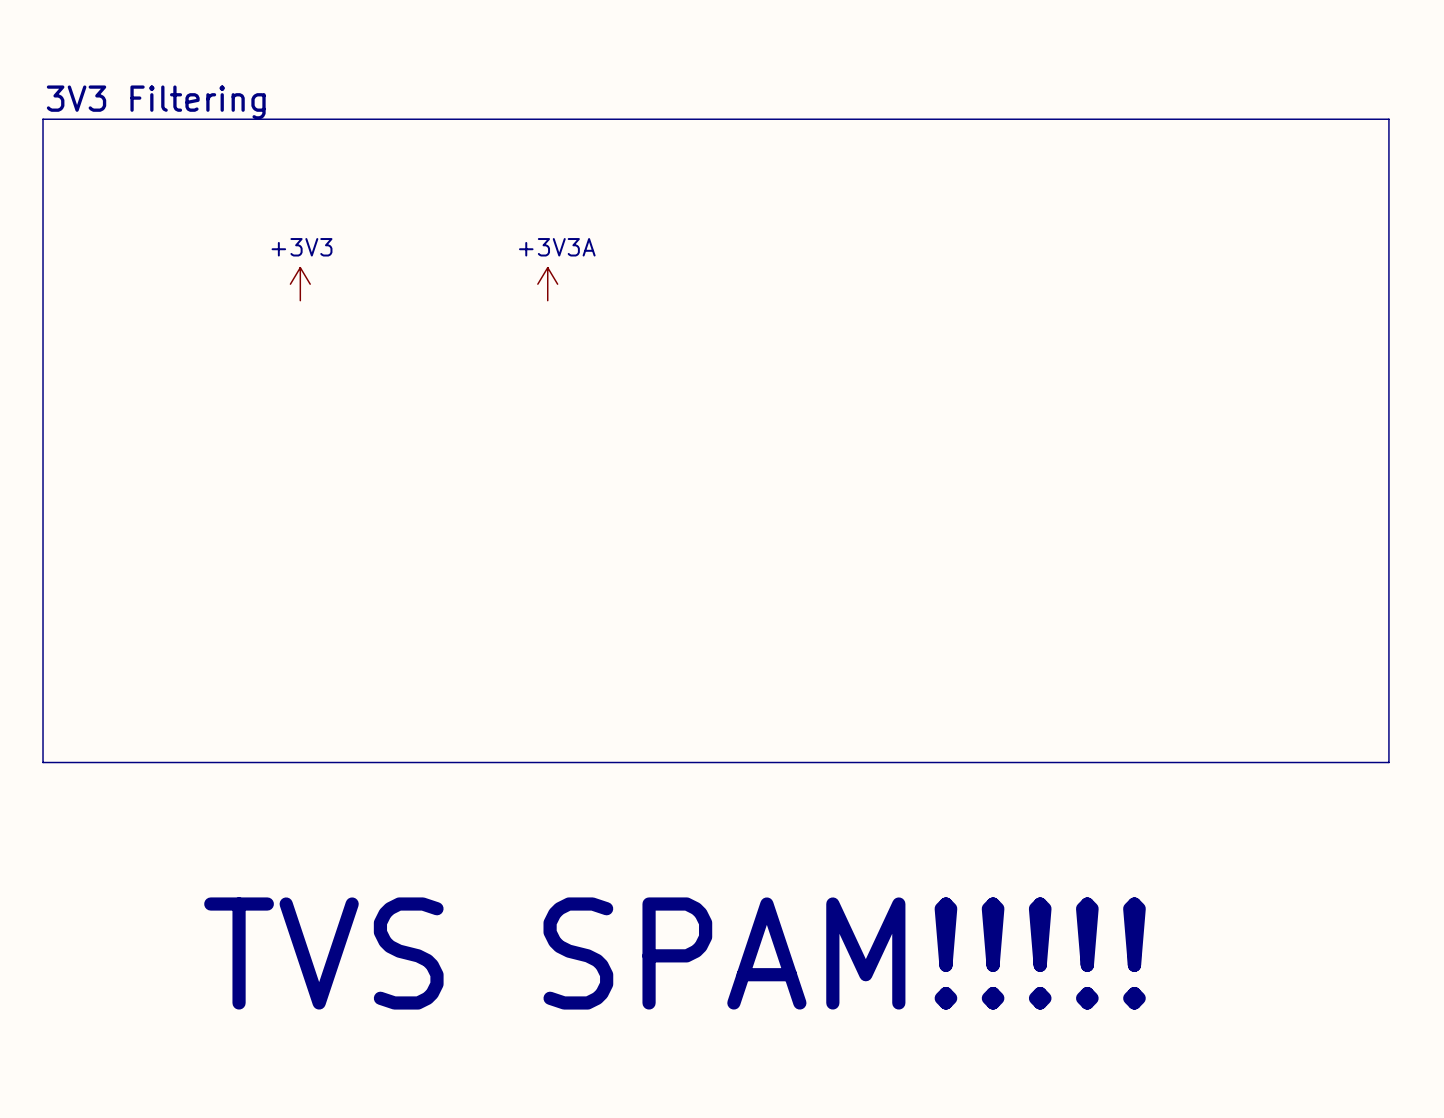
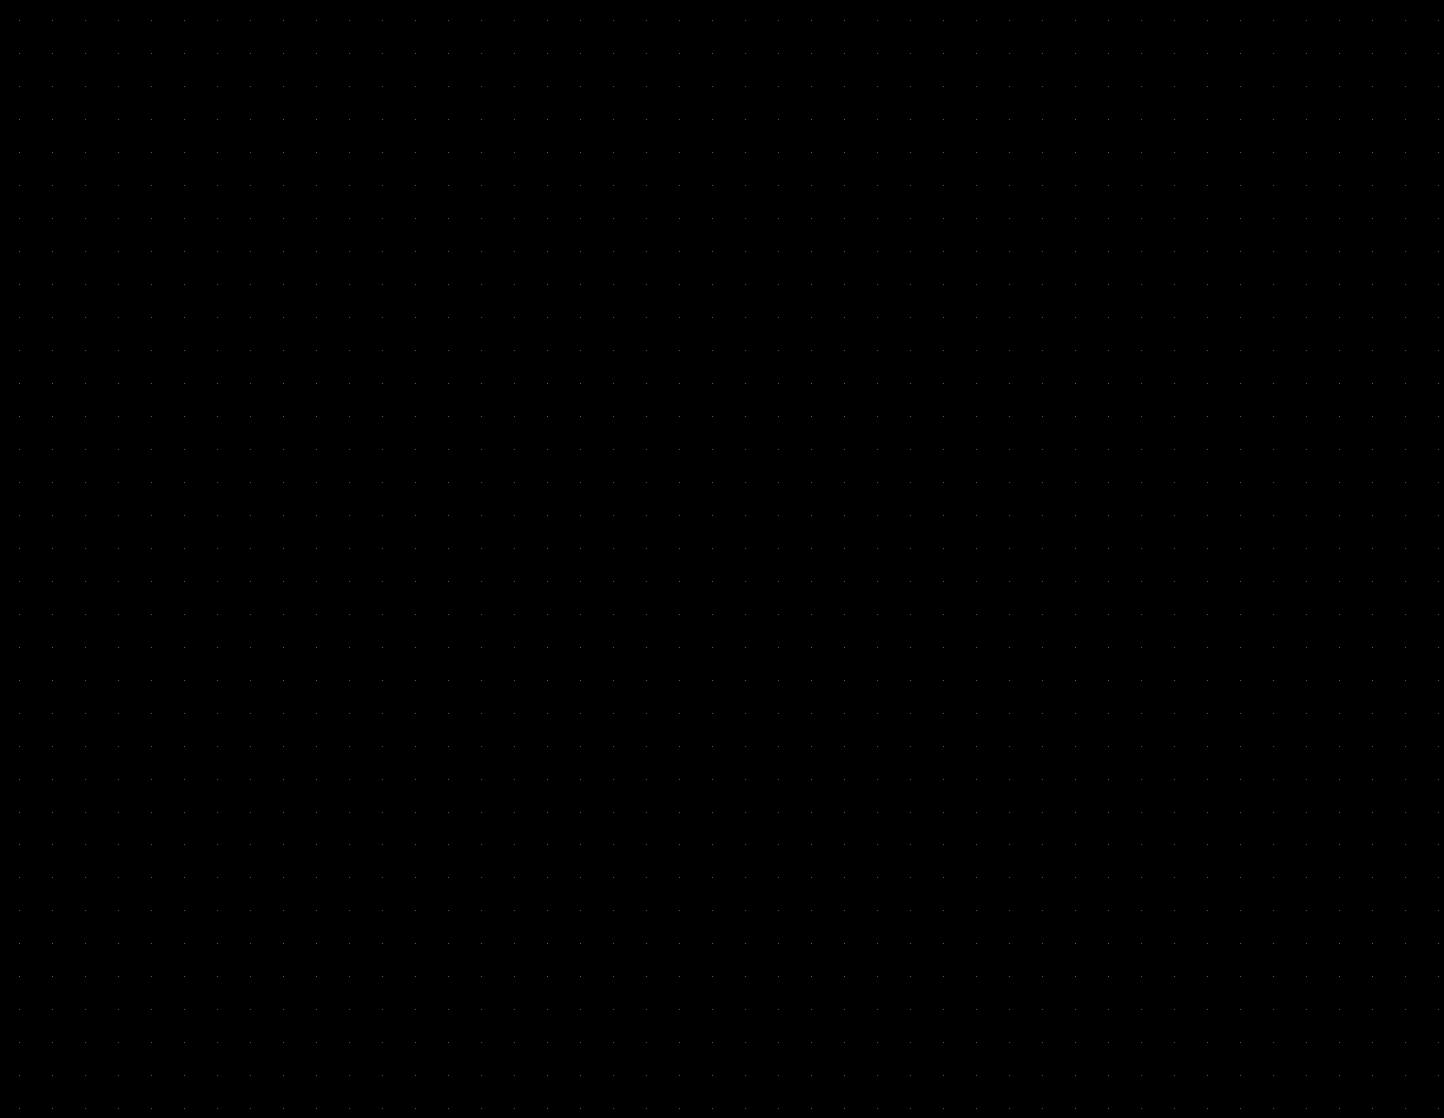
text: 3V3 Filtering (156, 102) -> none
line: (43, 119) (1388, 119) (1388, 762) (43, 762) (43, 119) -> none
power symbol: +3V3 (300, 284) -> none
power symbol: +3V3A (547, 284) -> none
text: TVS SPAM!!!!! (674, 953) -> none

